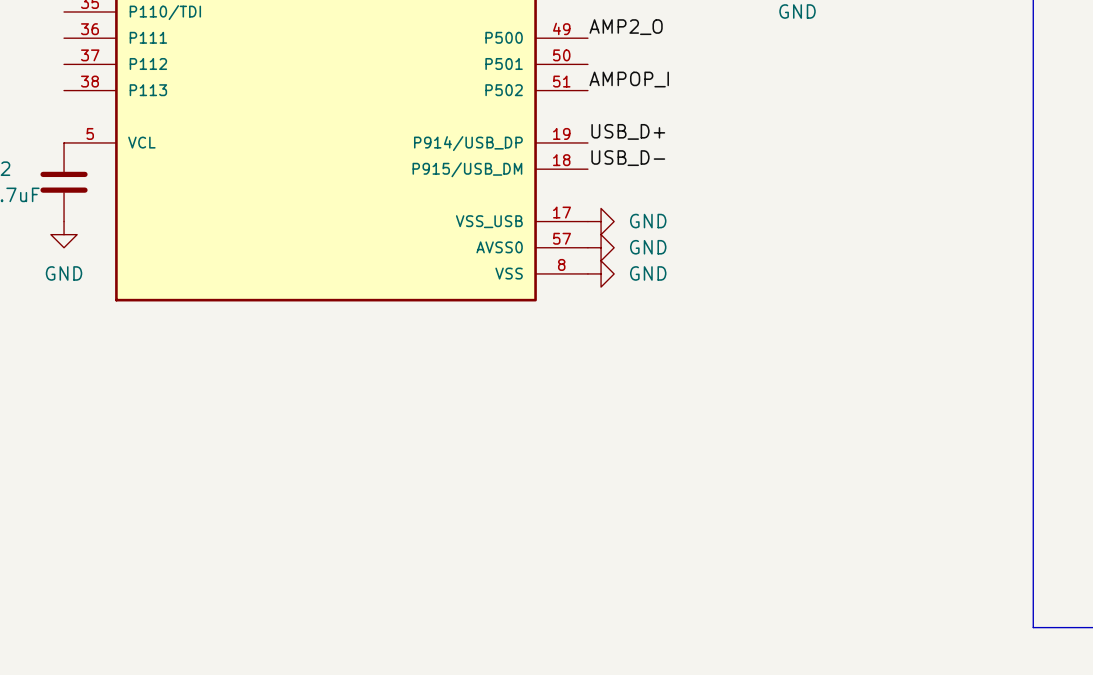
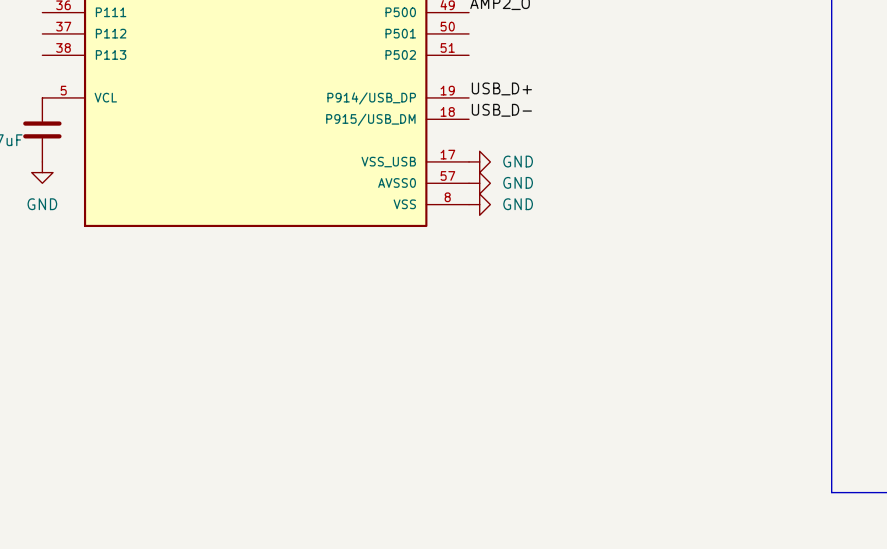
label: AMPOP_I (629, 79) -> none

